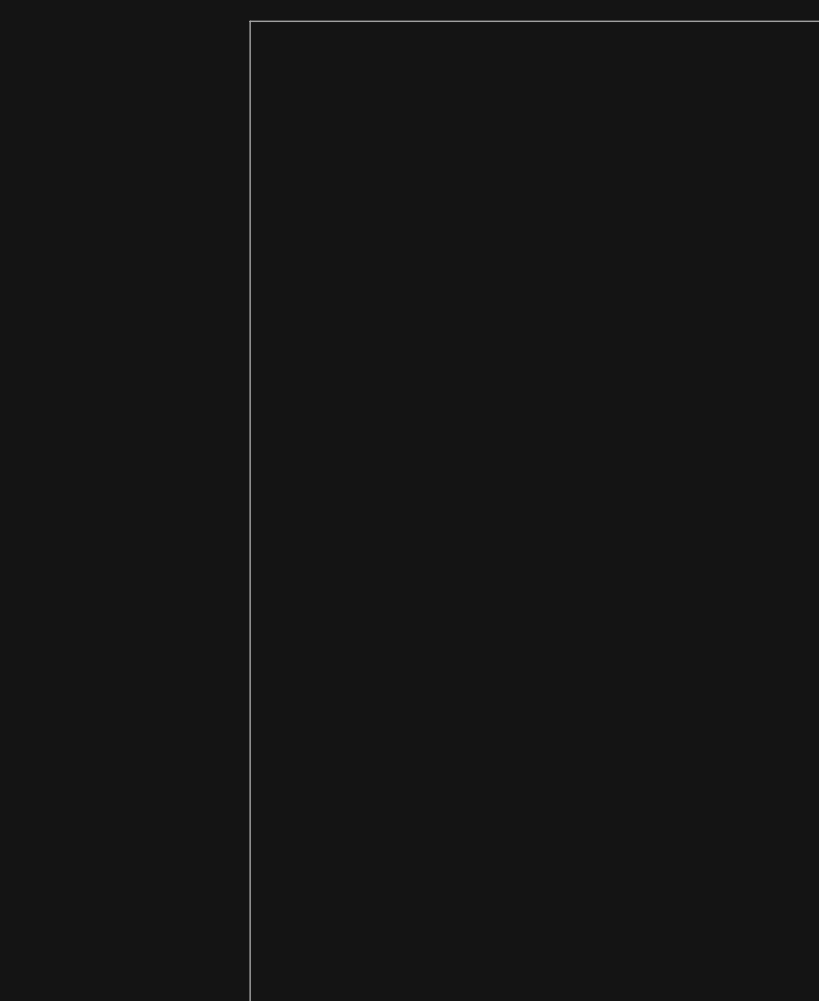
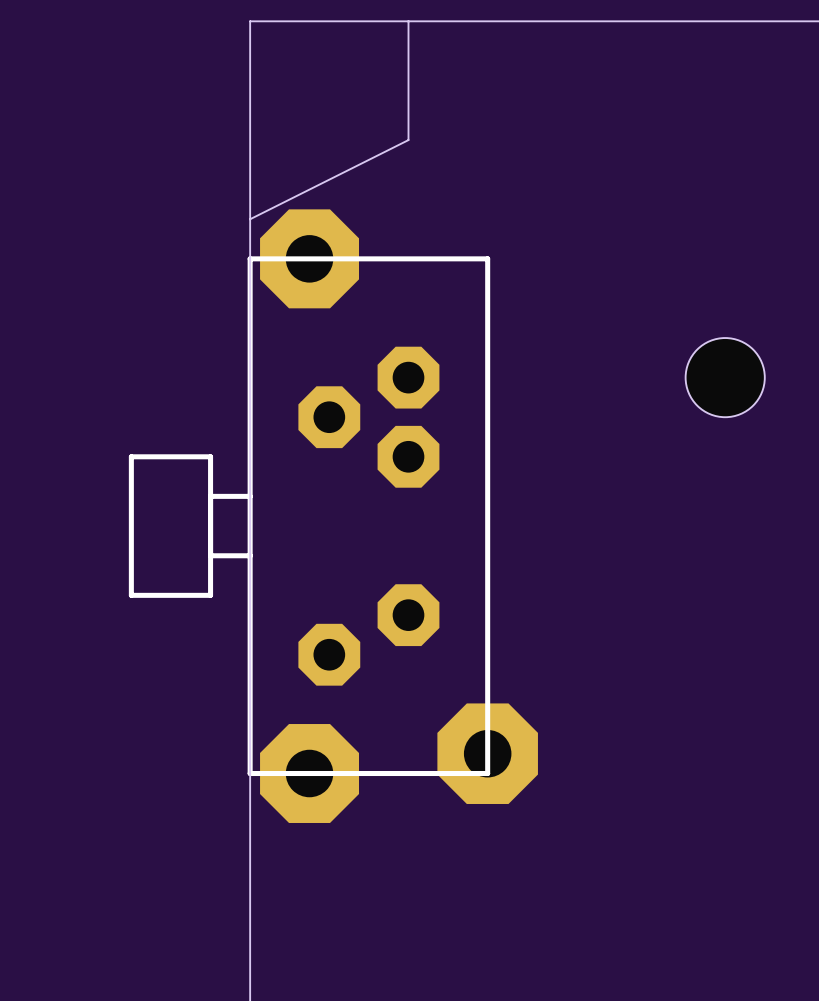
board edge: none -> (408, 21) (408, 140) (250, 219)
hole: none -> (725, 377)
part: none -> (333, 516)

